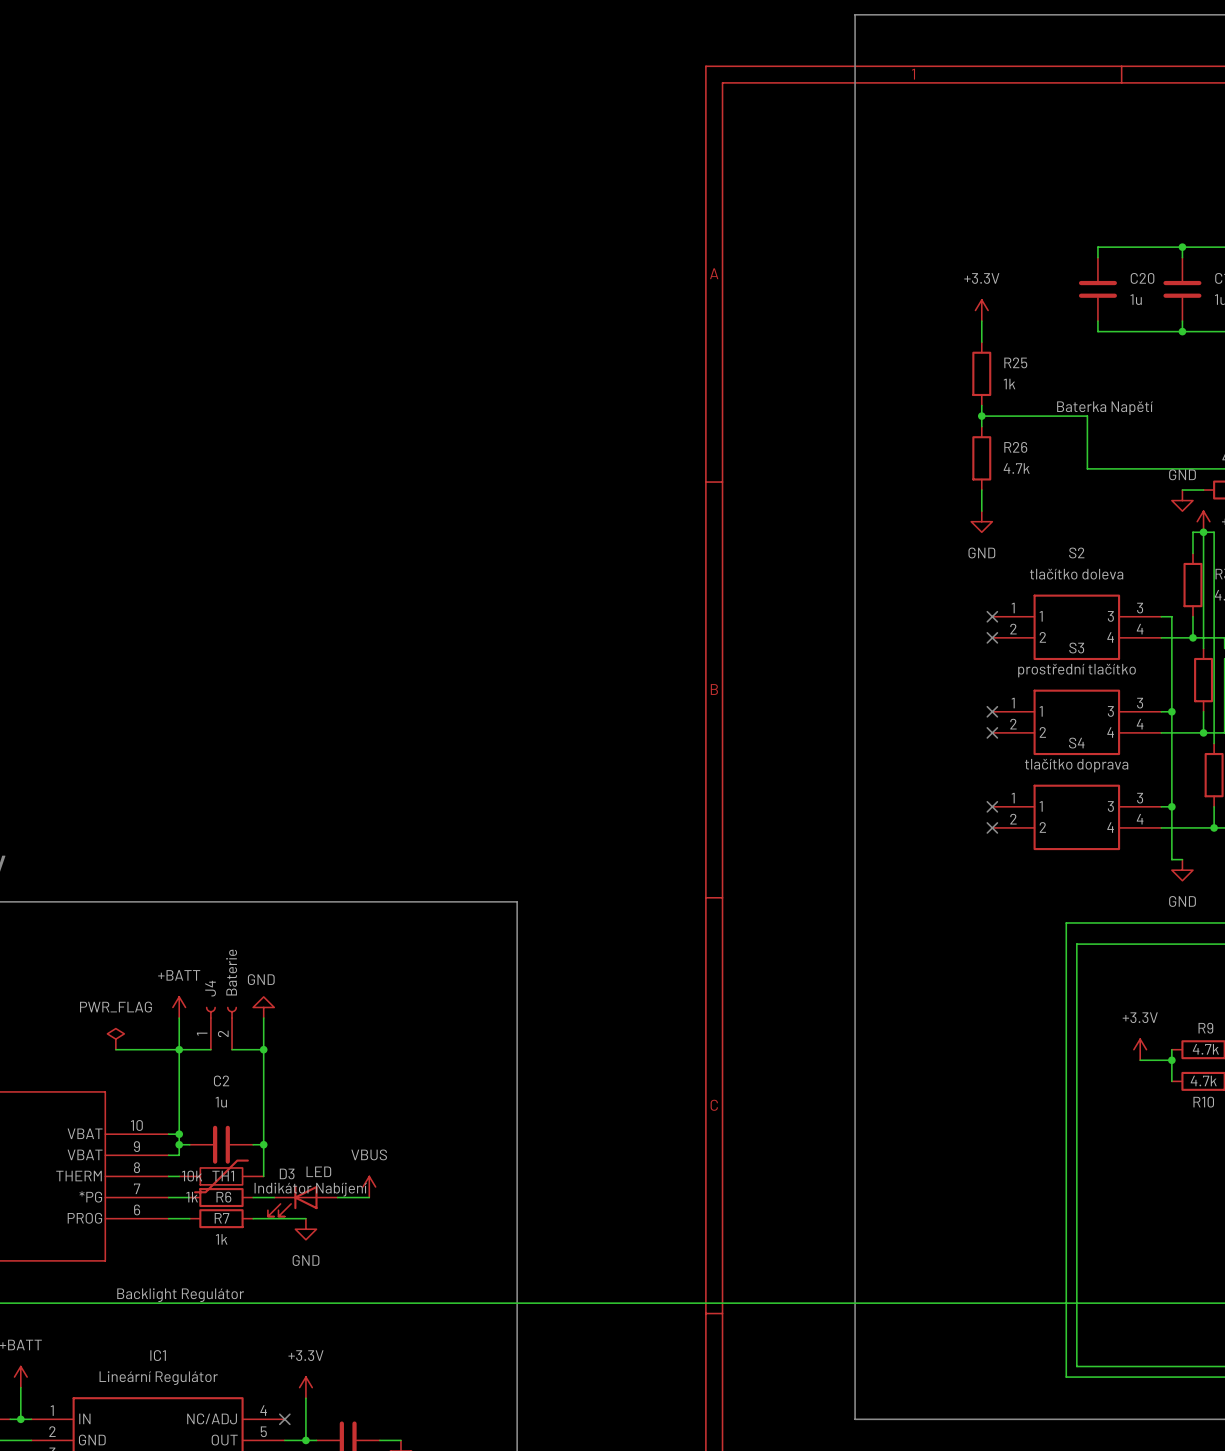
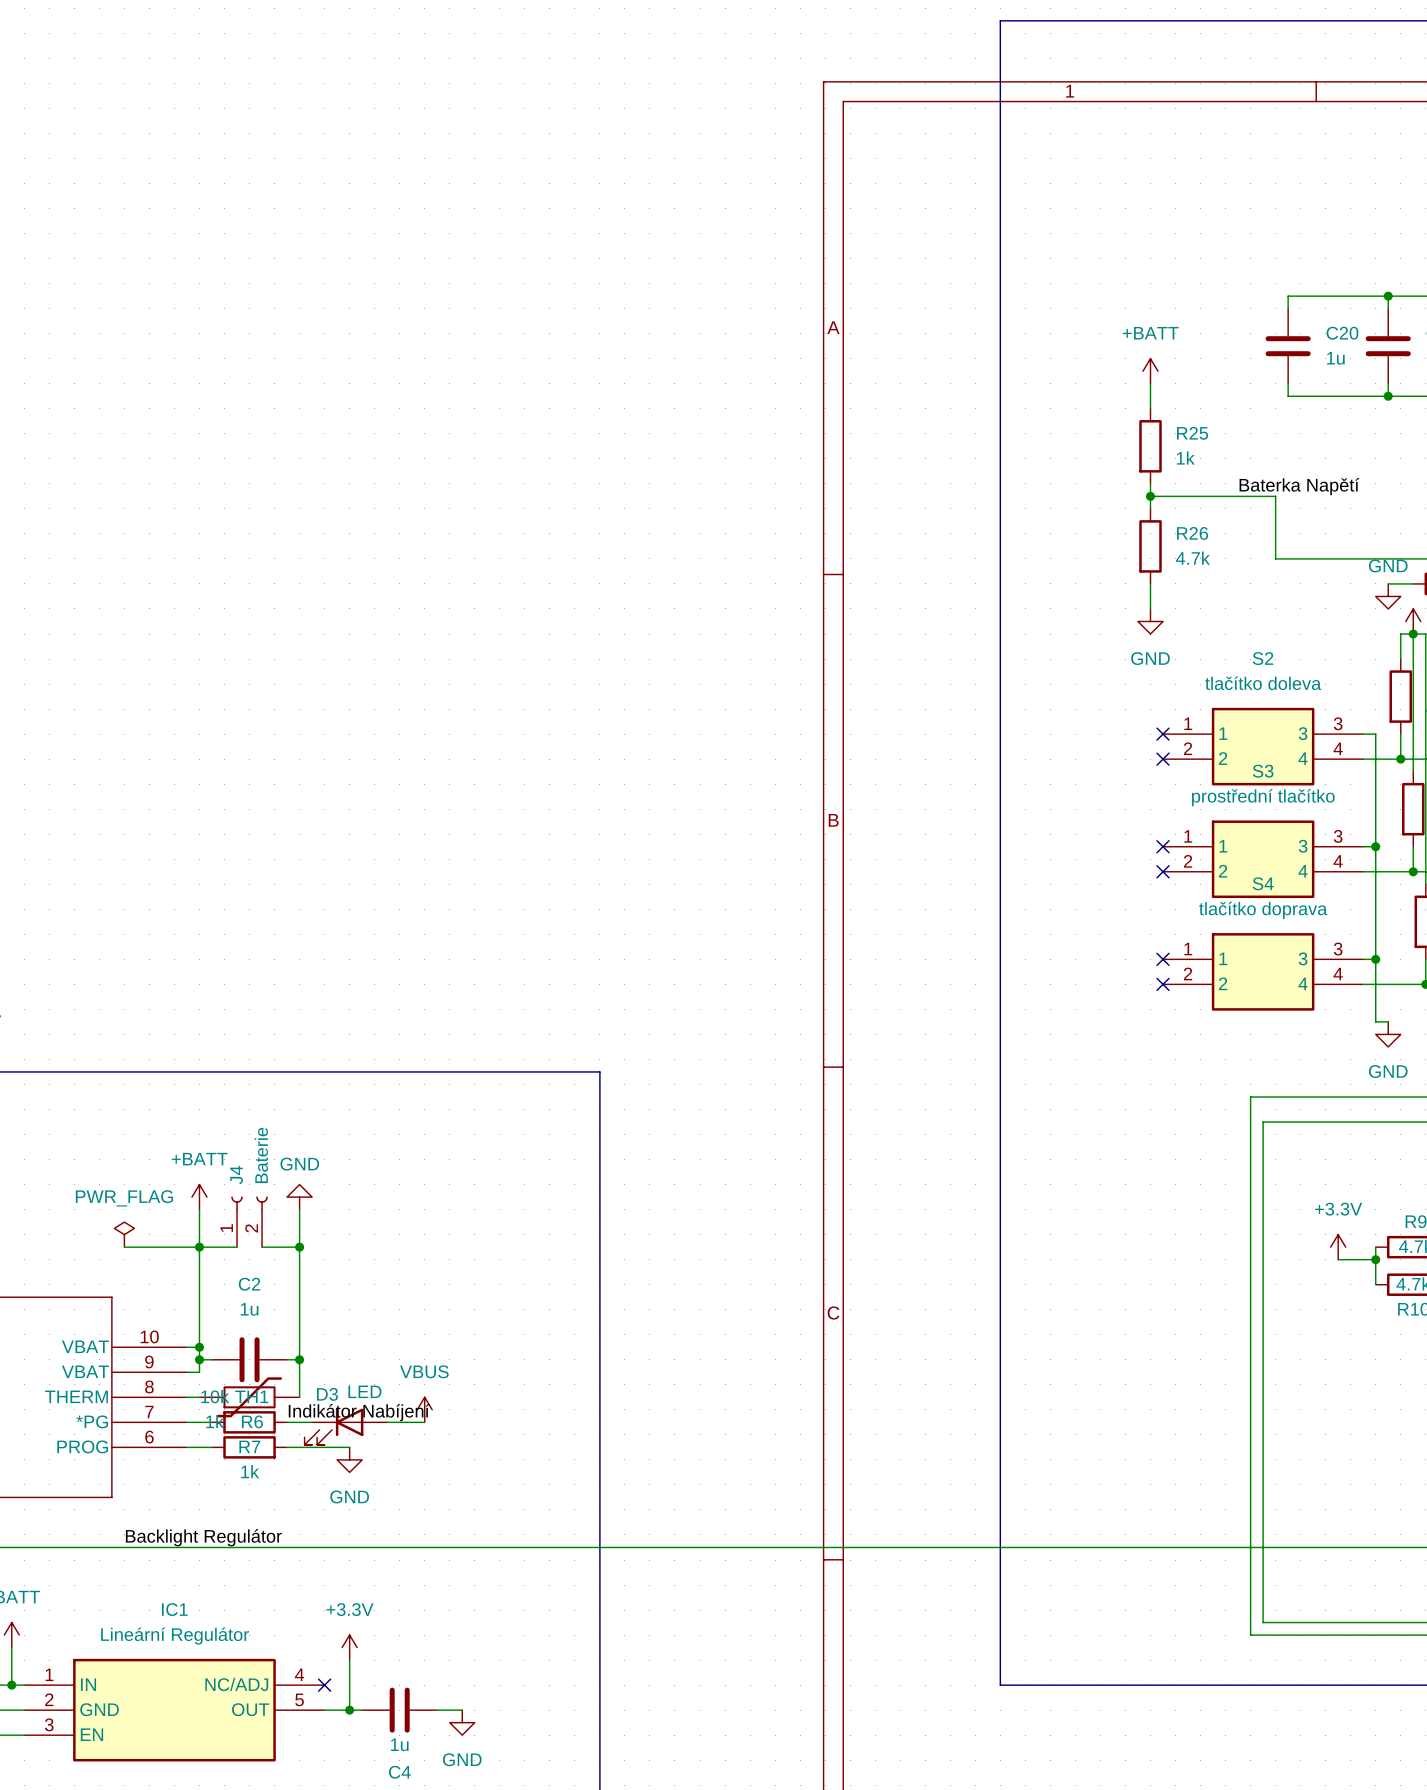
power symbol: +3.3V (981, 310) -> +BATT (1150, 371)

